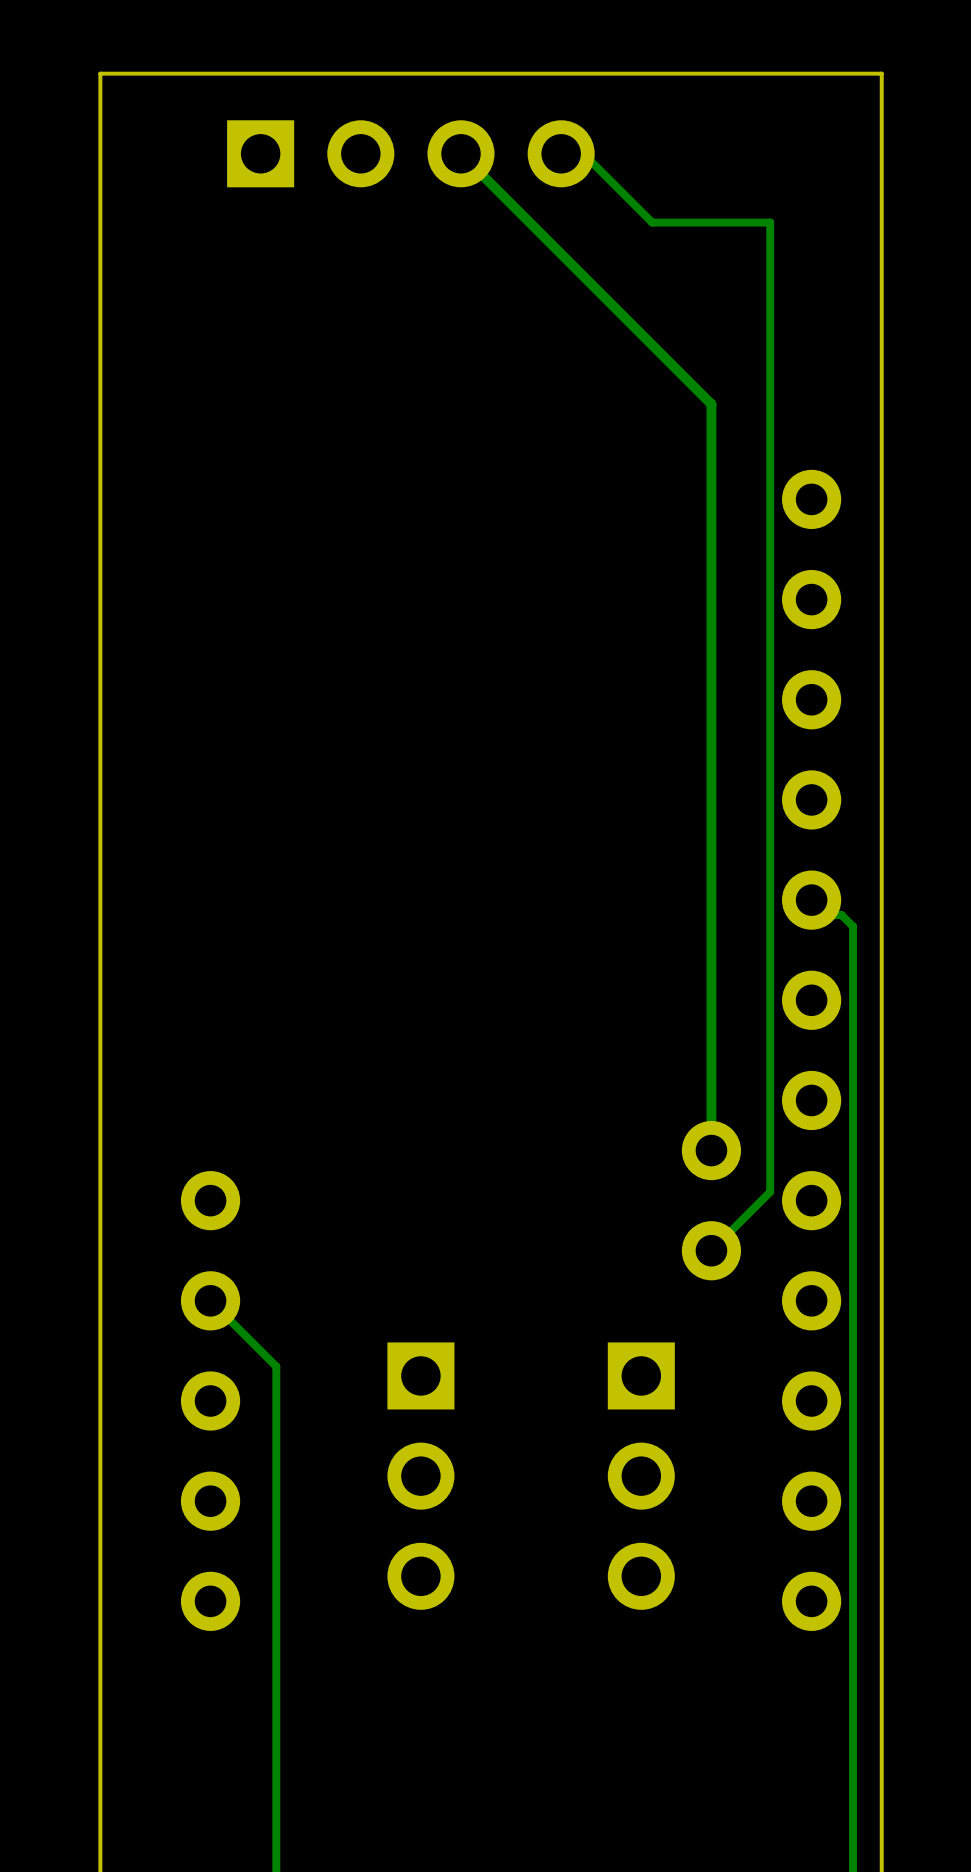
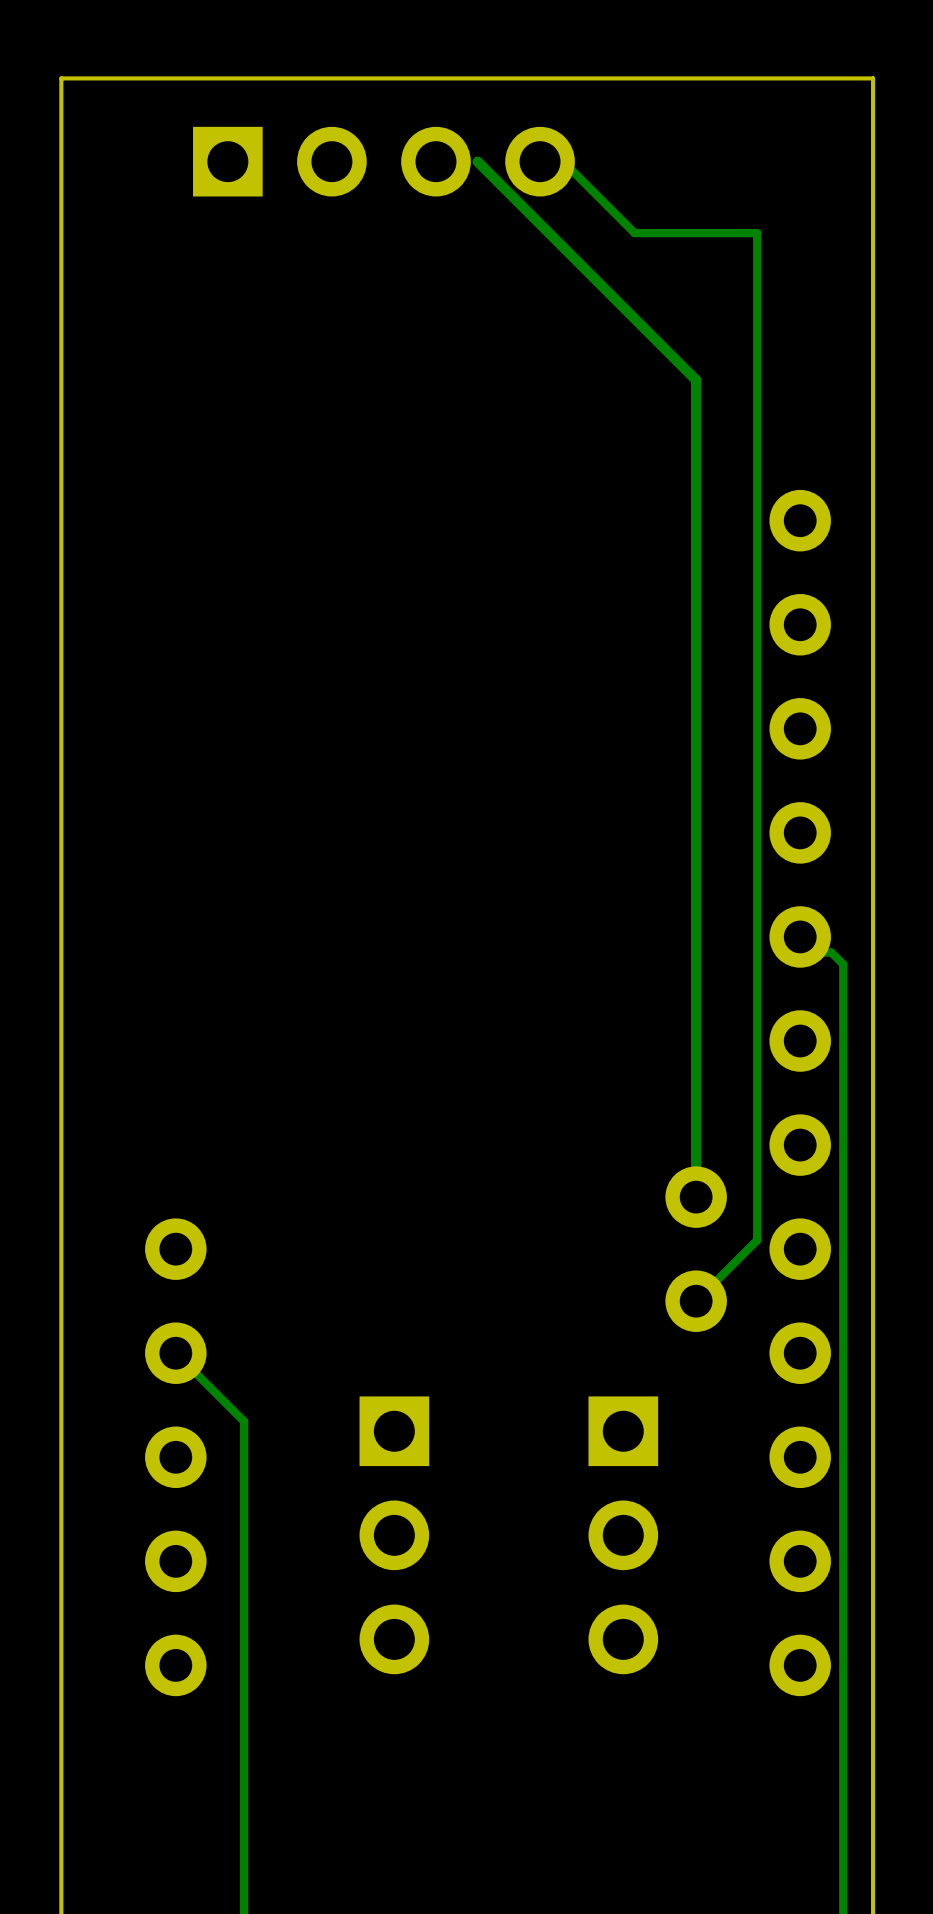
track: (461, 153) (711, 404) -> (477, 161) (696, 380) (696, 421)

